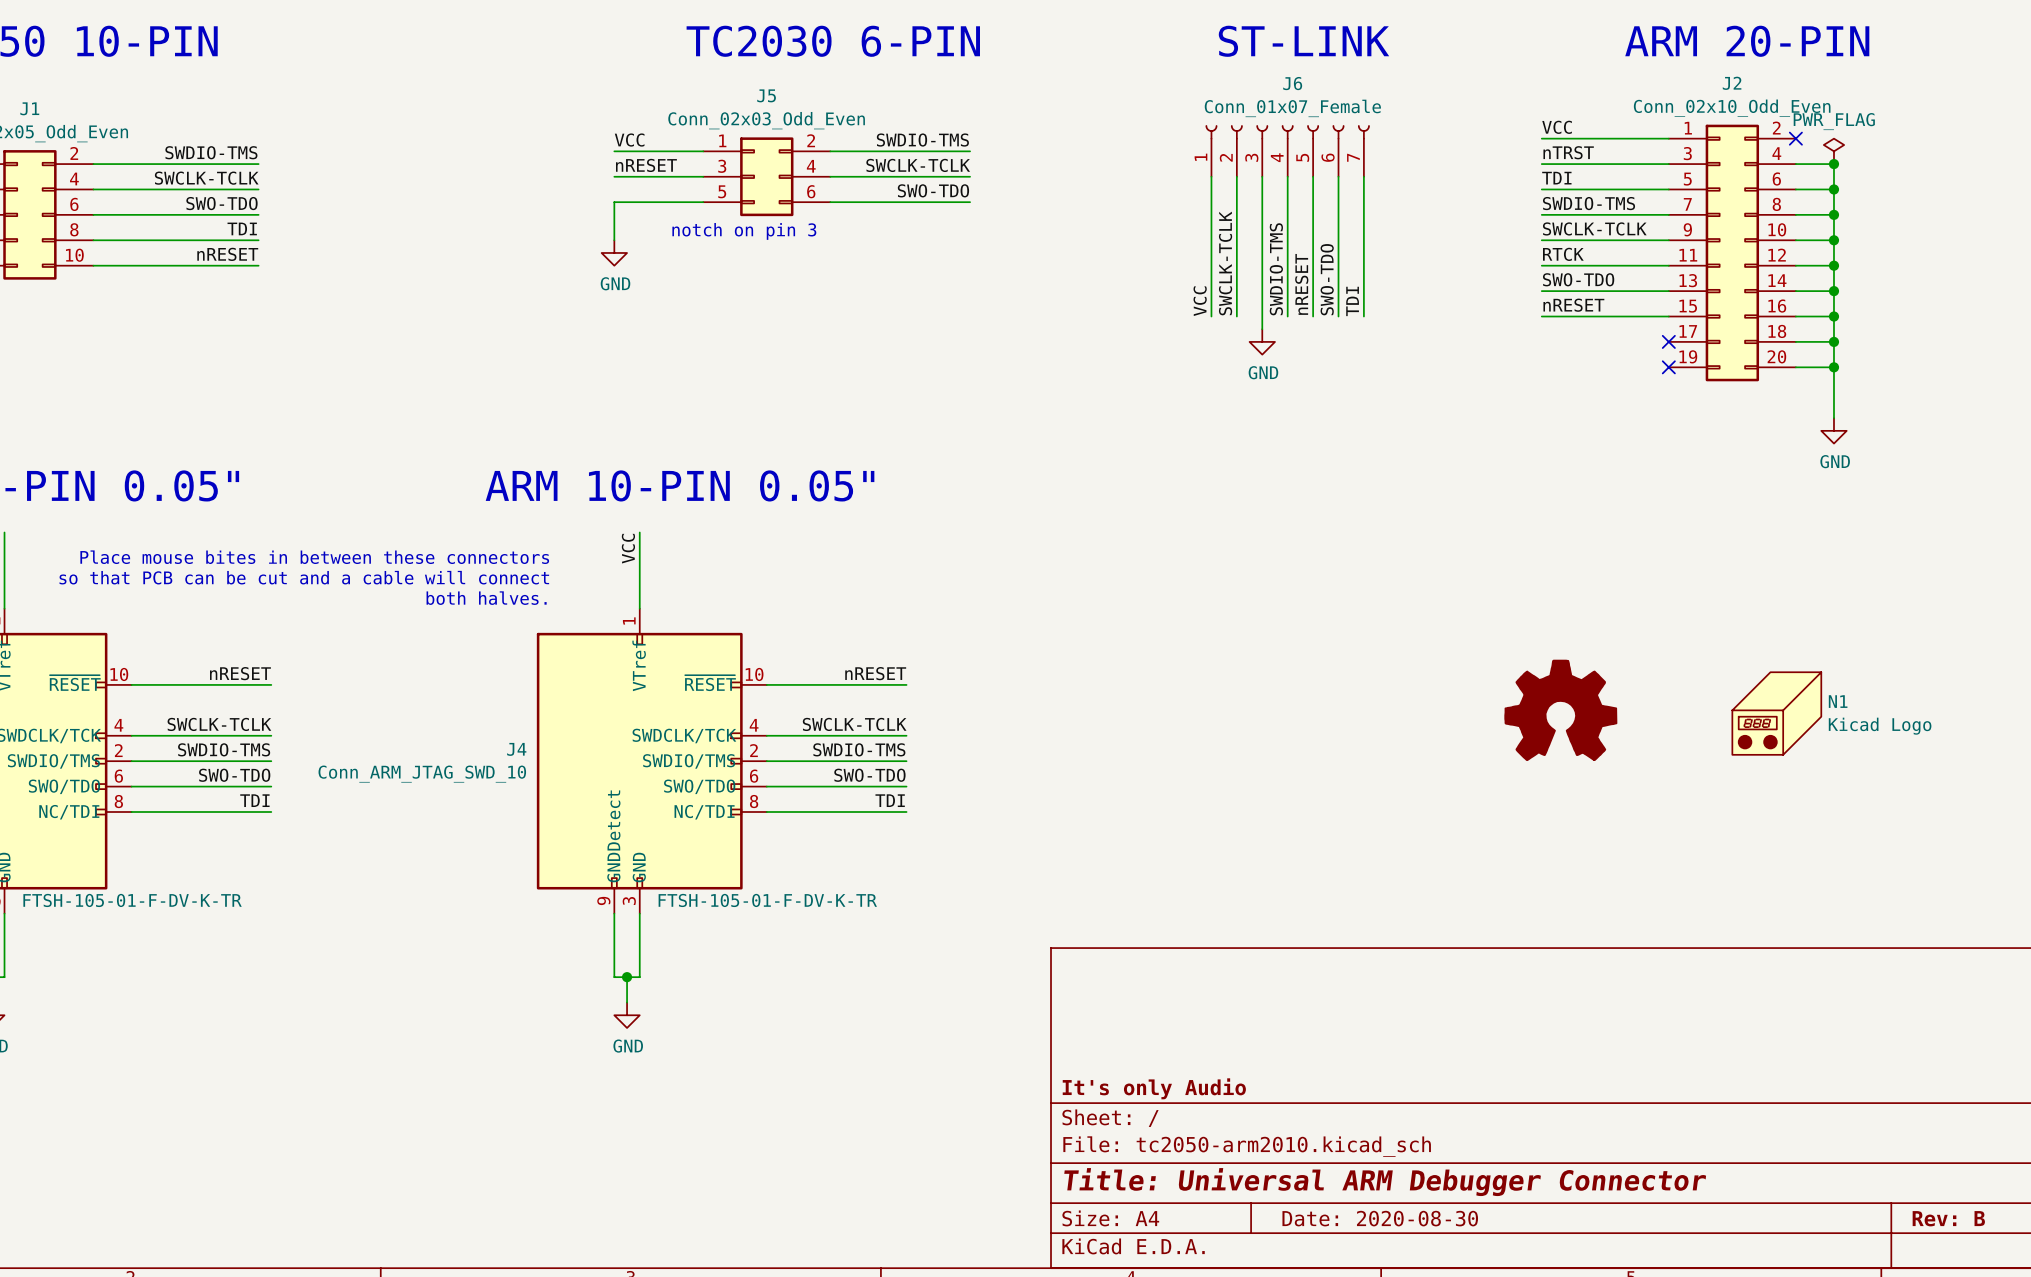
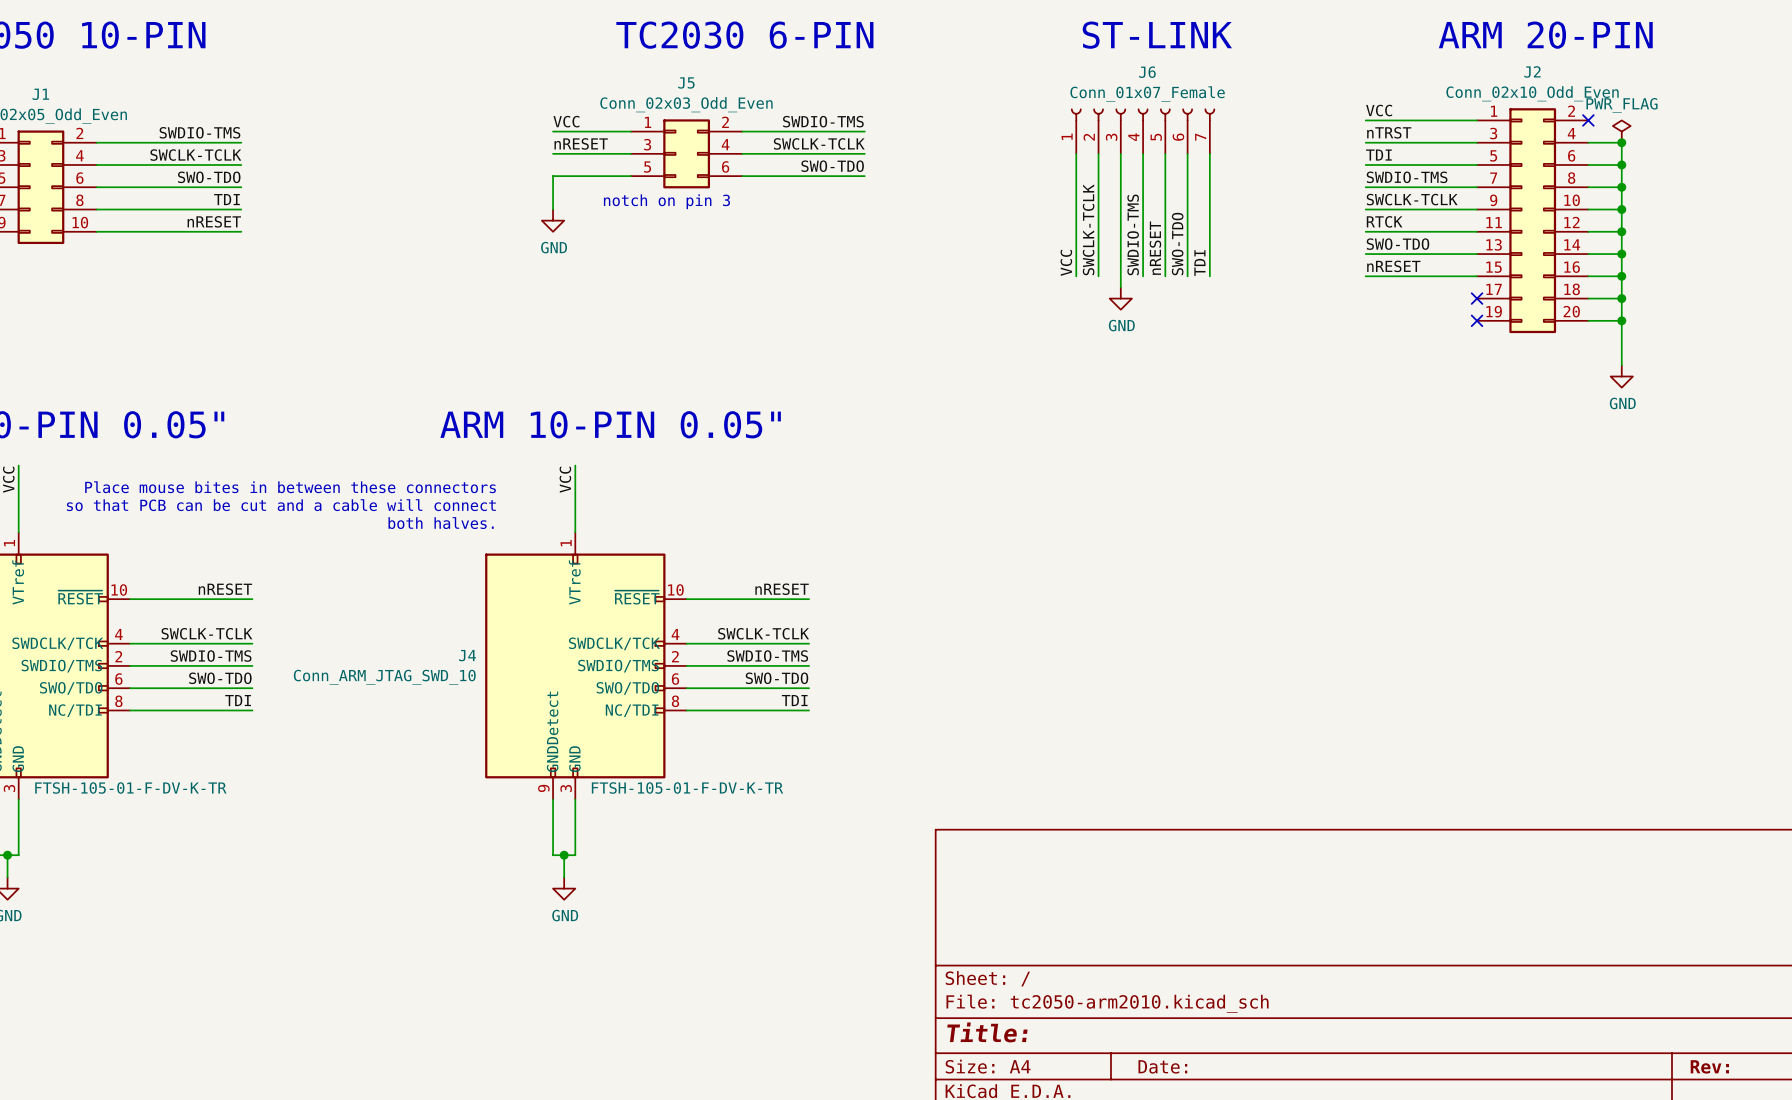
part: (1560, 710) -> none
N1: Kicad Logo (1776, 713) -> none
title block: It's only Audio (1154, 1088) -> none
title block: Title: Universal ARM Debugger Connector (1385, 1182) -> Title: (987, 1032)
title block: Date: 2020-08-30 (1380, 1218) -> Date: (1162, 1066)
title block: Rev: B (1948, 1218) -> Rev: (1709, 1066)

